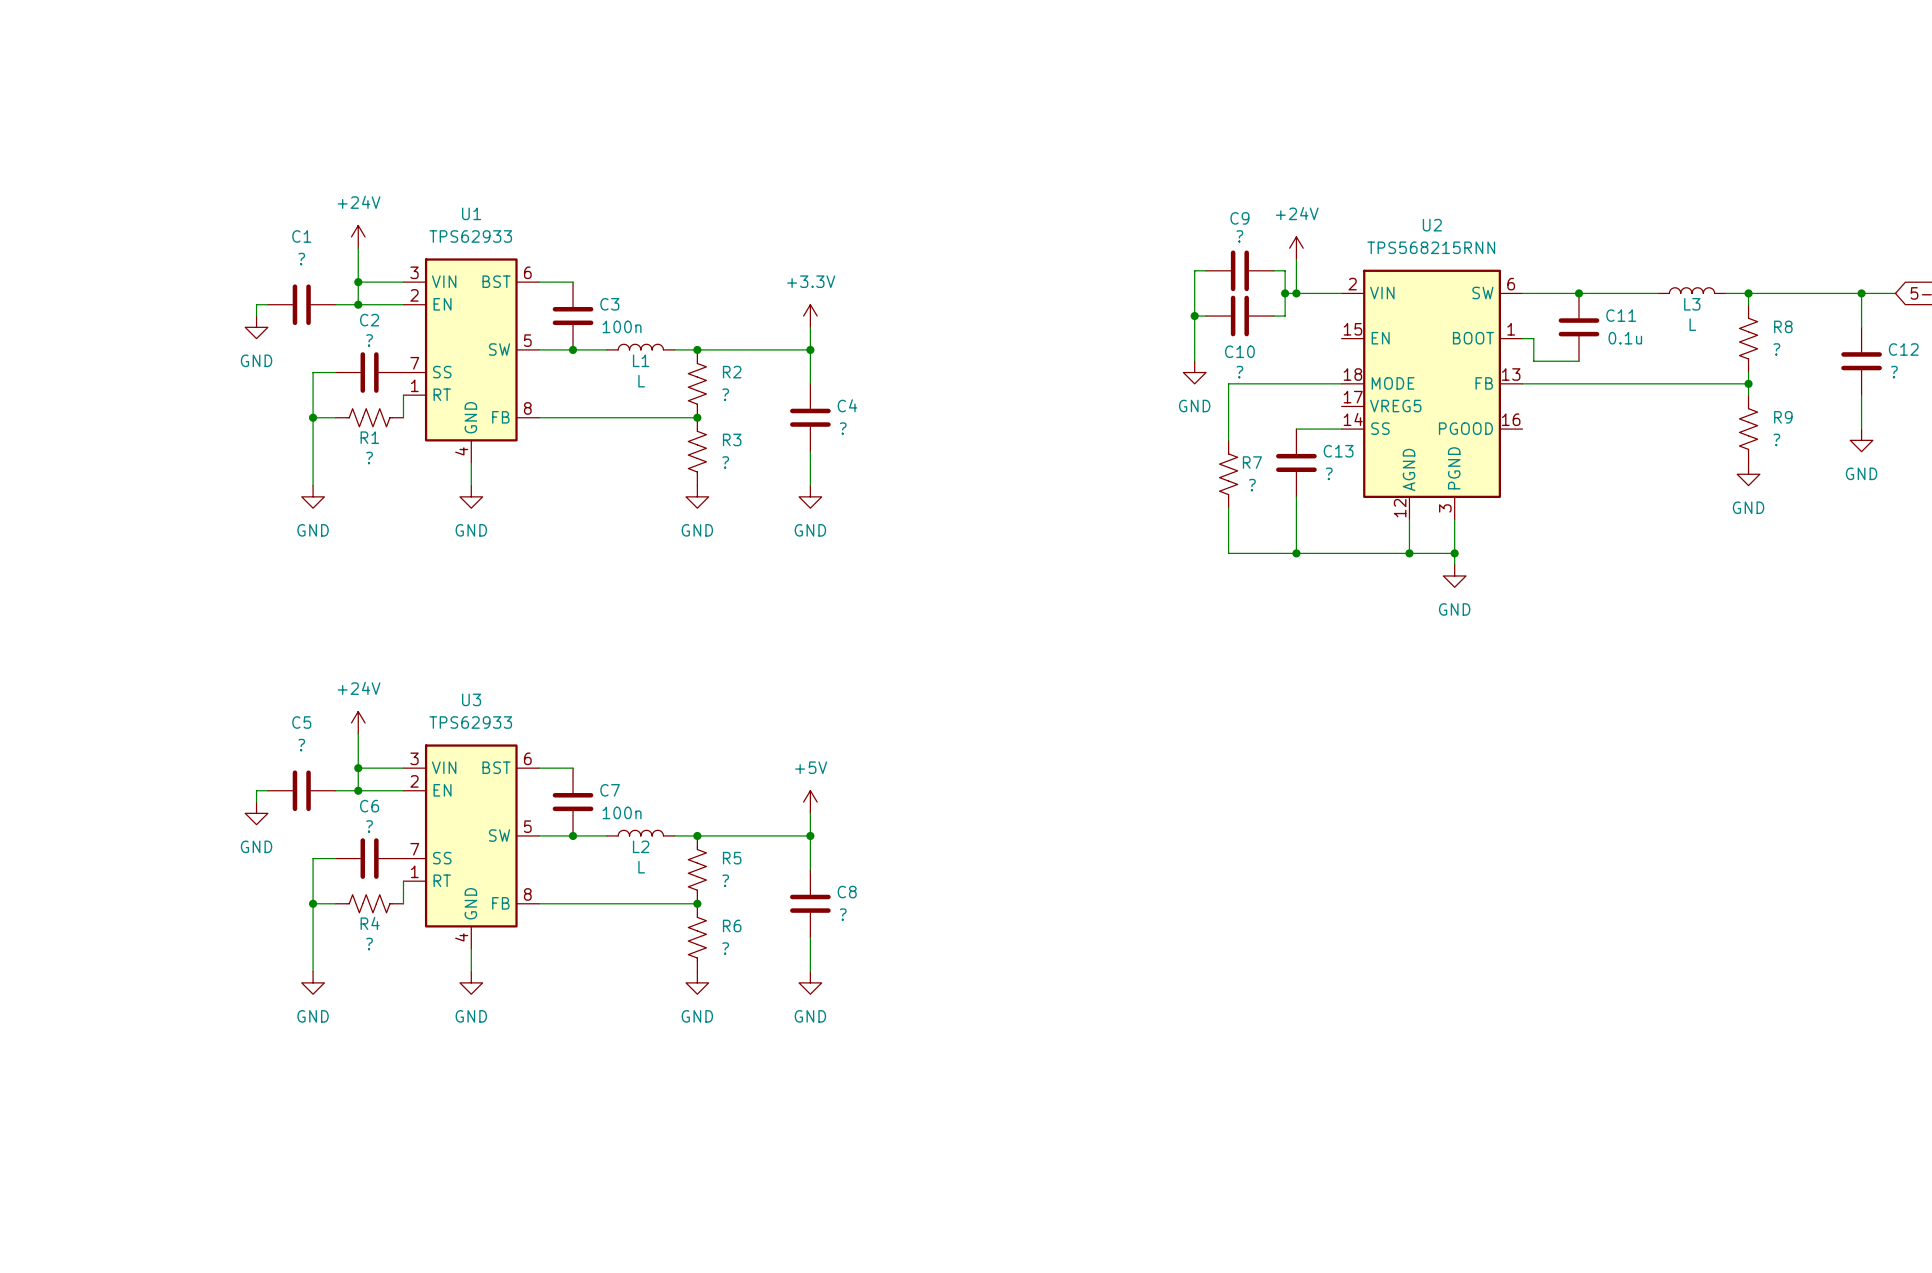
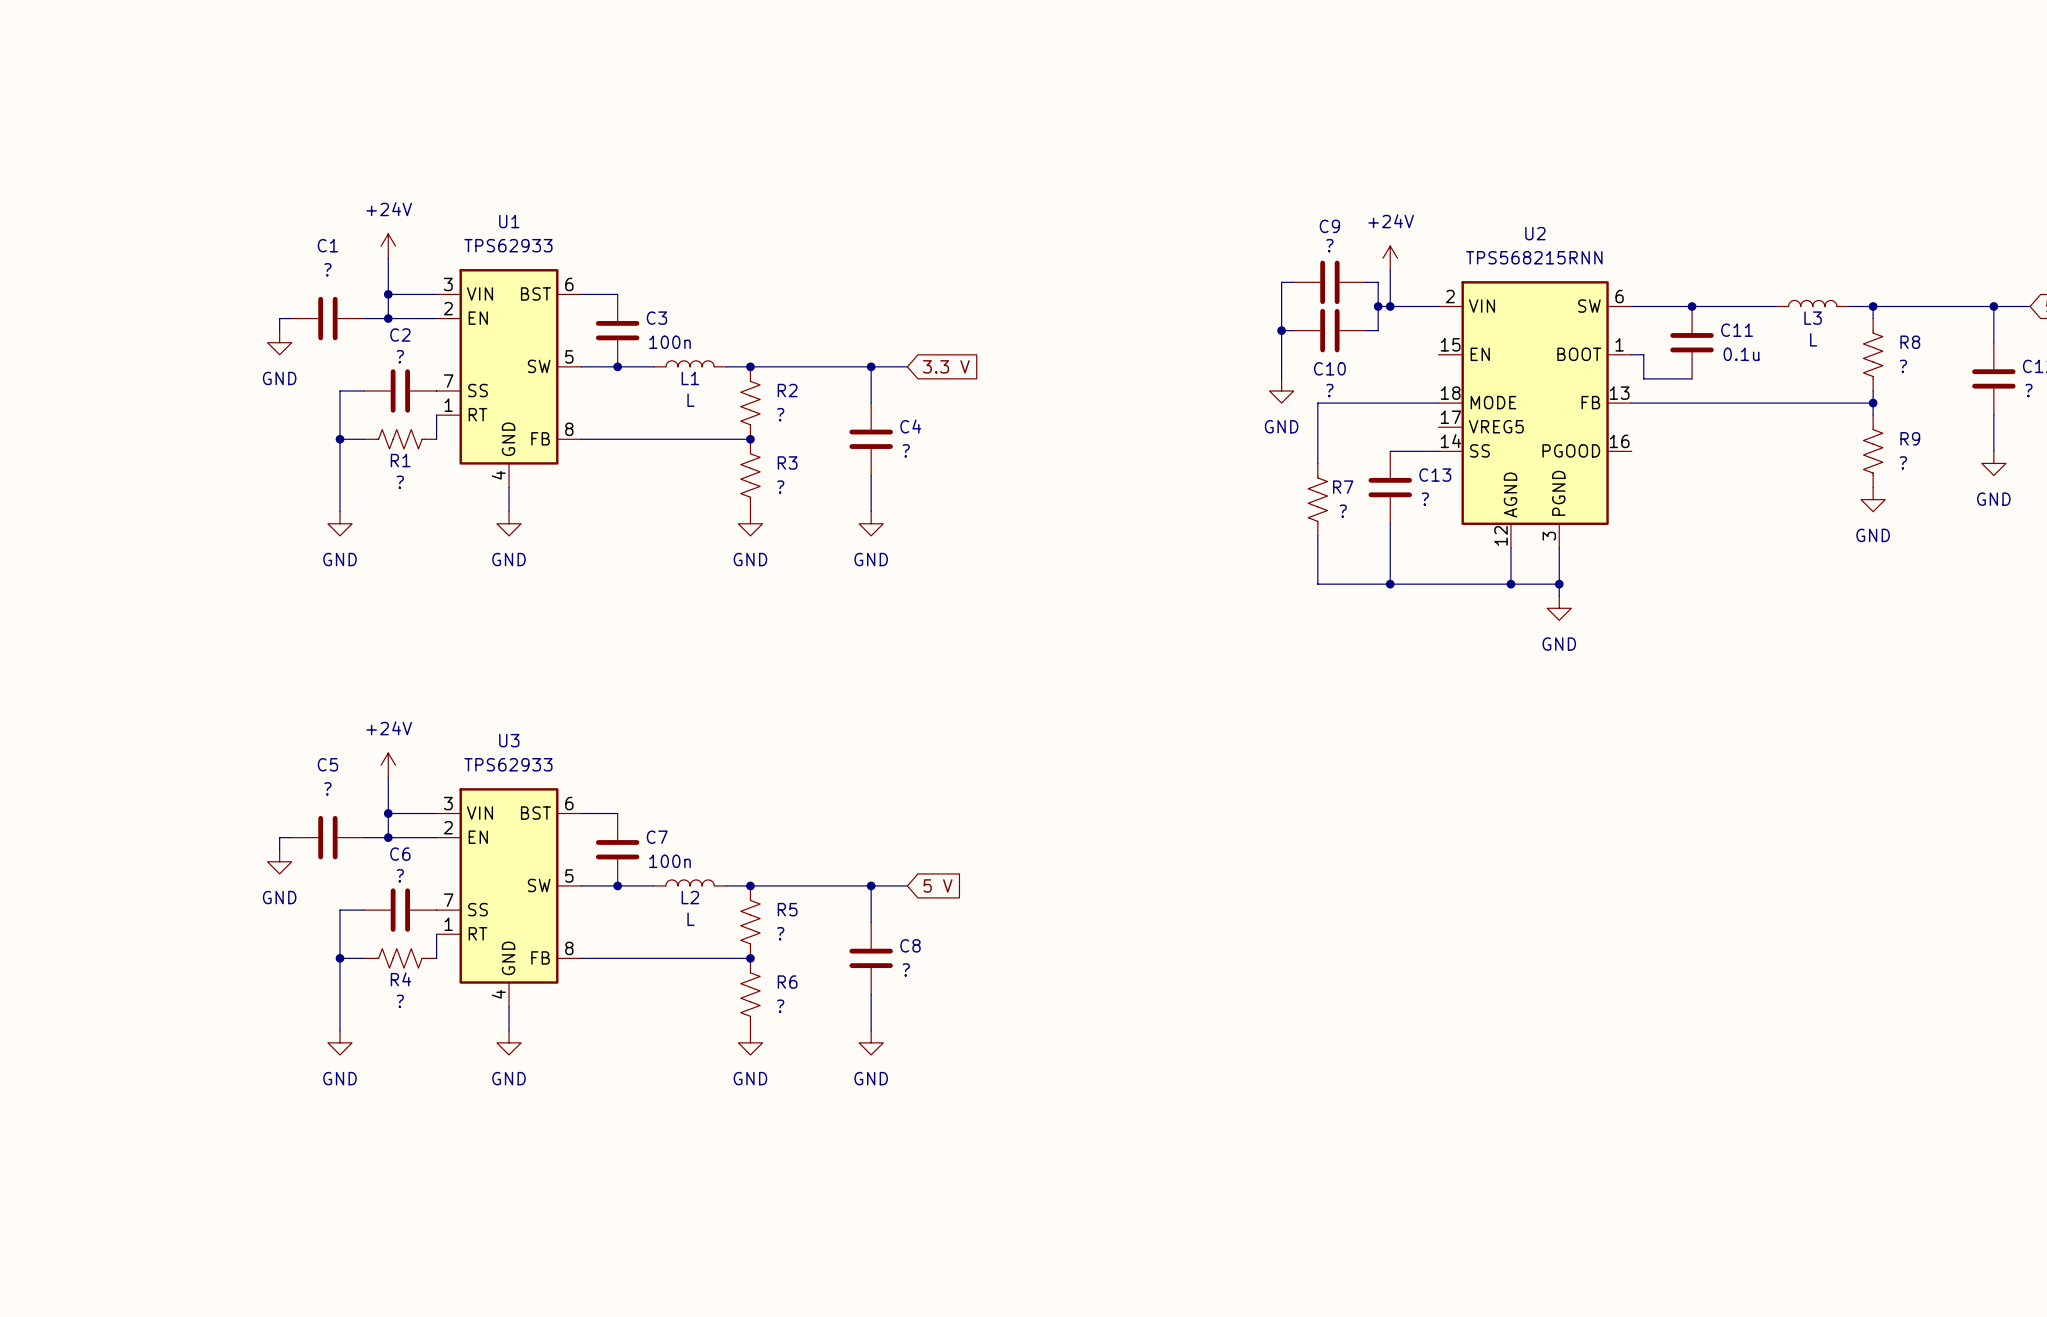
power symbol: +3.3V (810, 316) -> none
wire: (810, 327) (810, 349) -> (907, 366) (871, 366)
global label: none -> 3.3 V (946, 366)
power symbol: +5V (810, 802) -> none
wire: (810, 813) (810, 835) -> (907, 885) (871, 885)
global label: none -> 5 V (938, 885)

